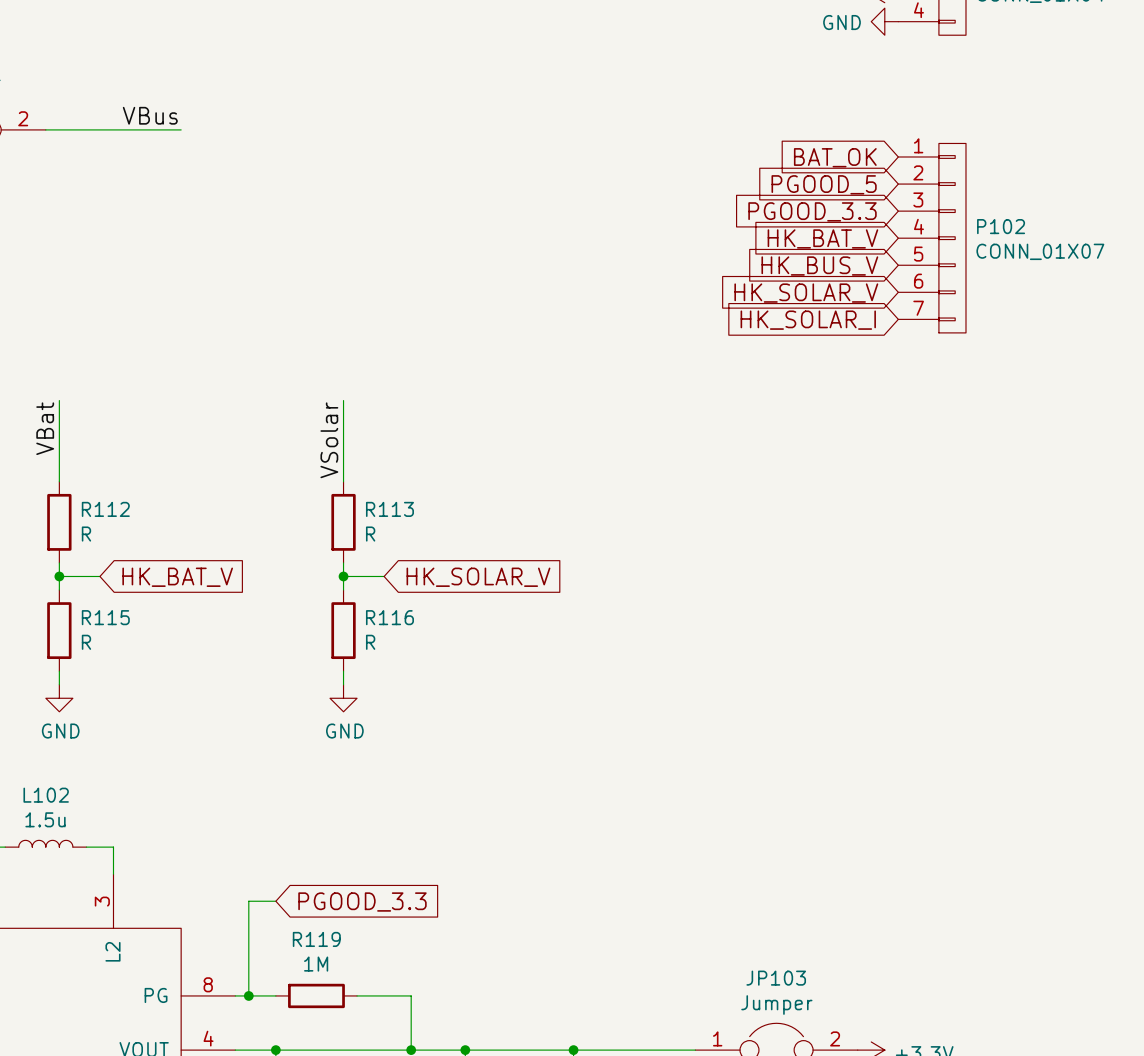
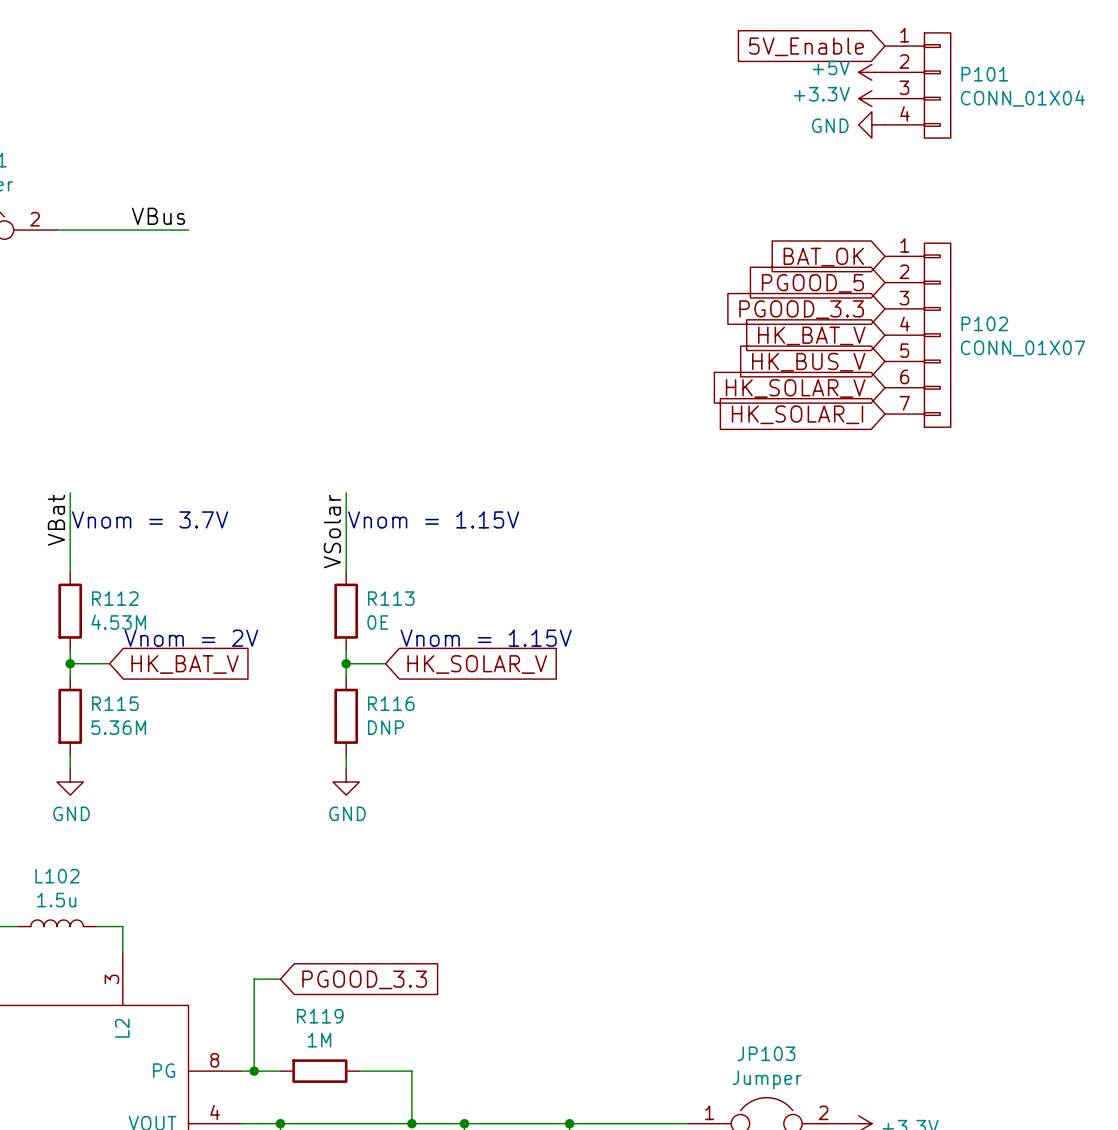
text: none -> Vnom = 3.7V (150, 519)
text: none -> Vnom = 1.15V (433, 519)
R112 value: R (86, 534) -> 4.53M (118, 622)
R113 value: R (370, 534) -> 0E (377, 622)
text: none -> Vnom = 2V (191, 638)
text: none -> Vnom = 1.15V (486, 638)
R115 value: R (86, 642) -> 5.36M (118, 727)
R116 value: R (370, 642) -> DNP (385, 727)

